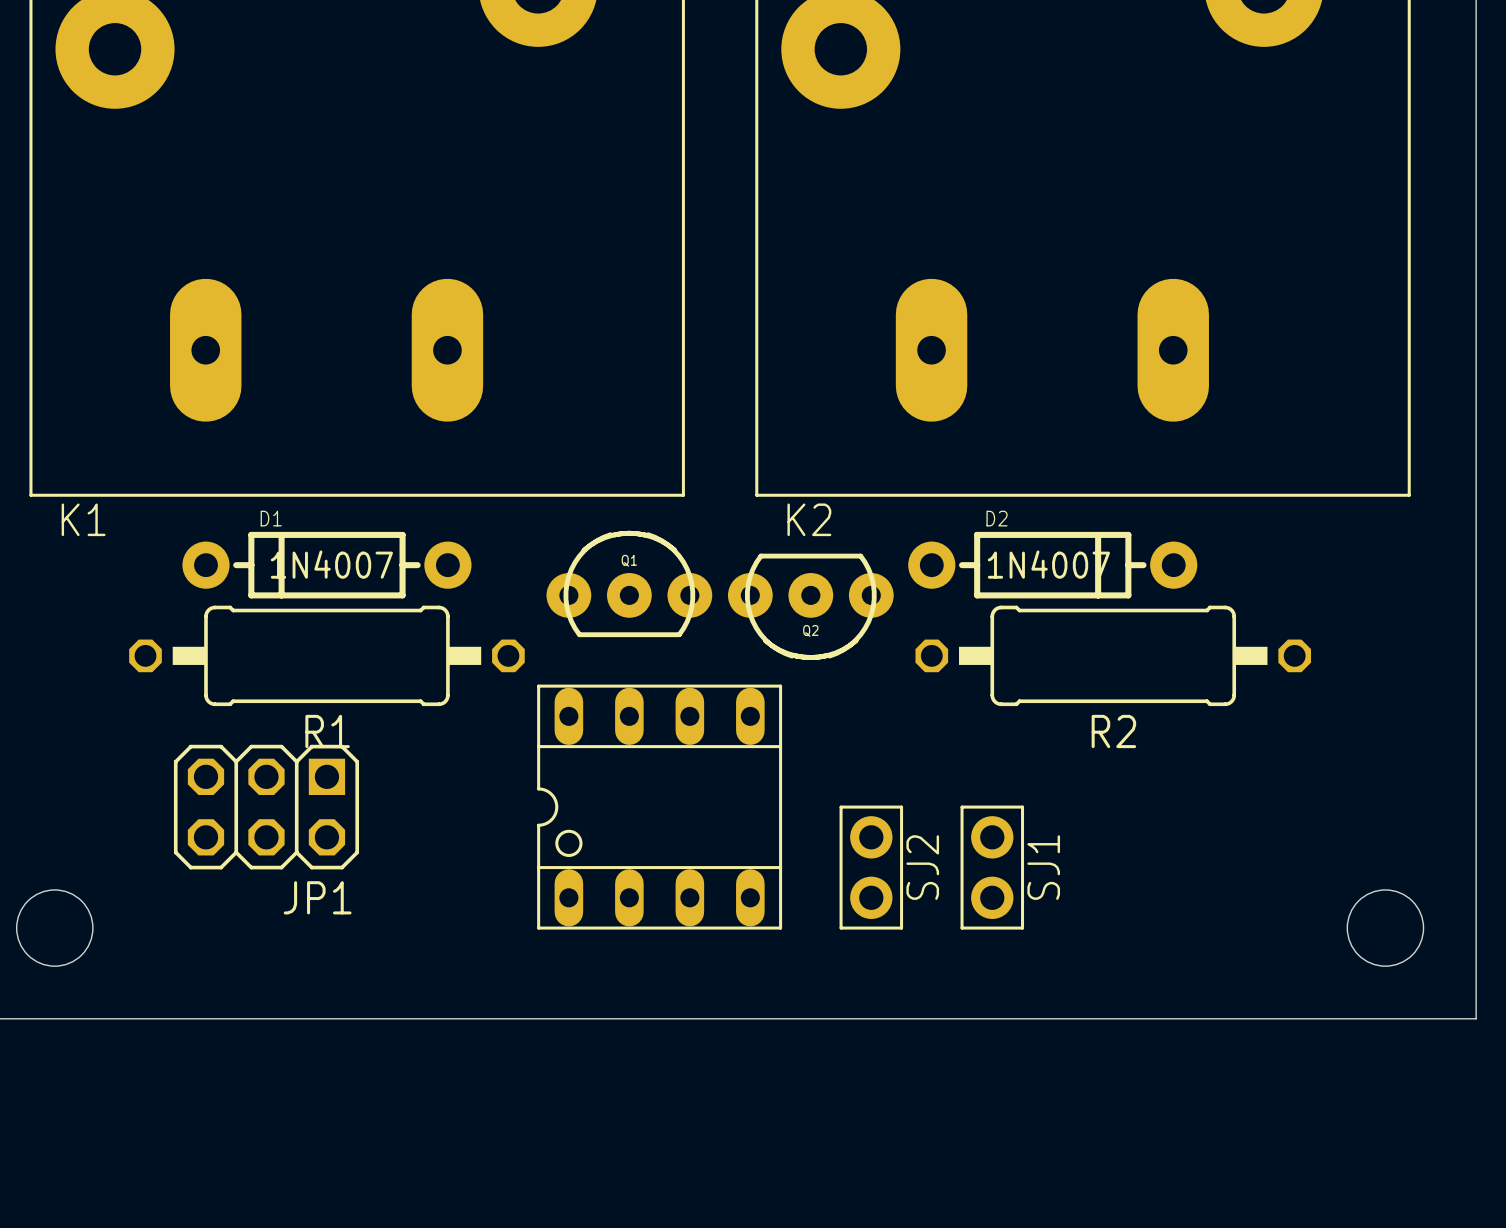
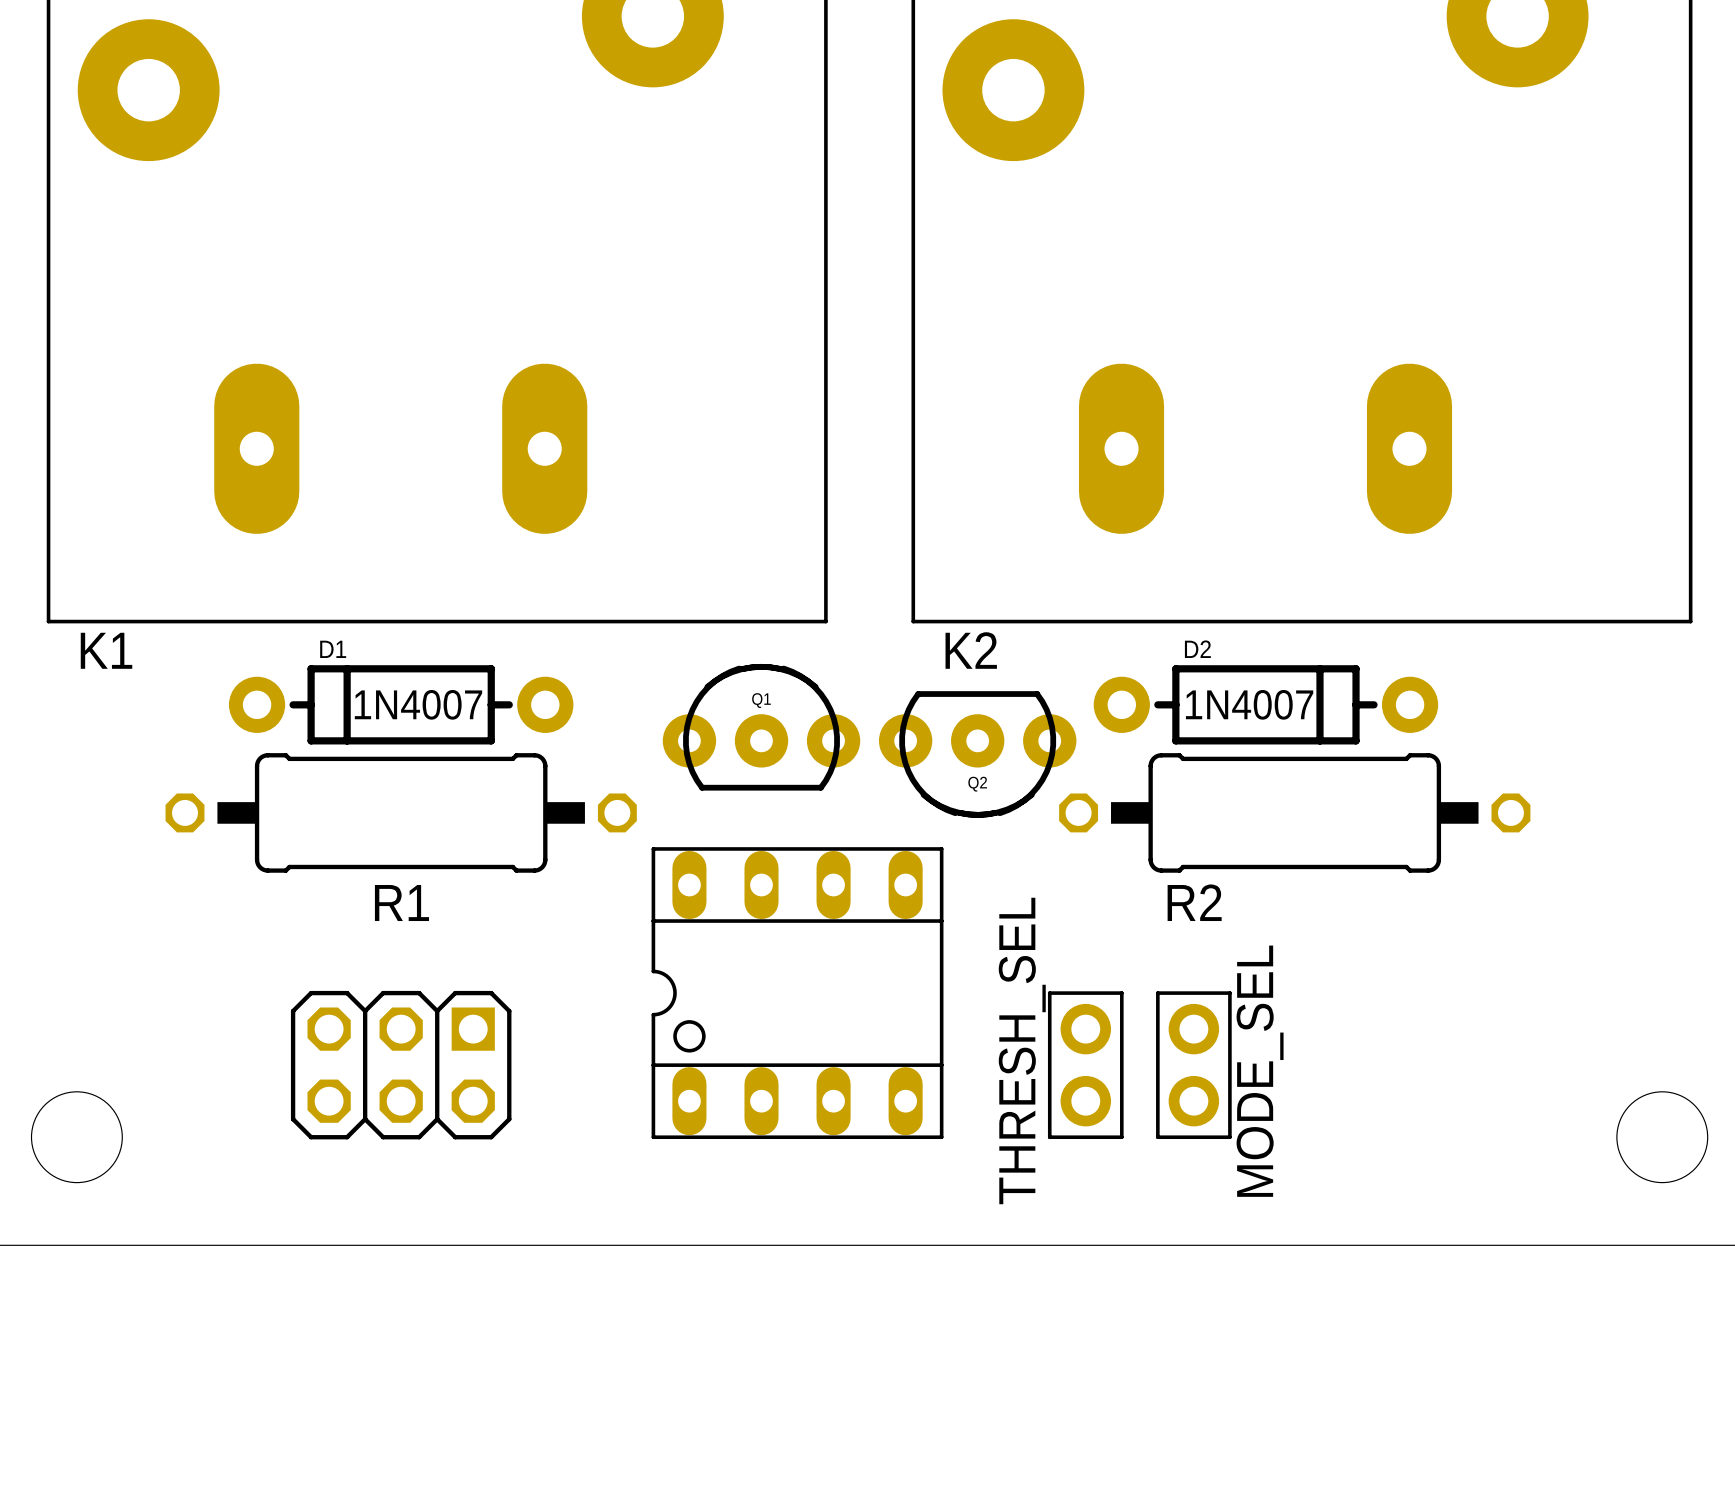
R2 position: (1113, 655) -> (1294, 812)
R2 name position: R2 (1113, 731) -> R2 (1194, 902)
JP1: (266, 807) -> none
part: none -> (401, 1065)
SJ2: (871, 867) -> none
THRESH_SEL: none -> (1085, 1065)
SJ1 name: SJ1 (1043, 867) -> MODE_SEL (1260, 1071)

